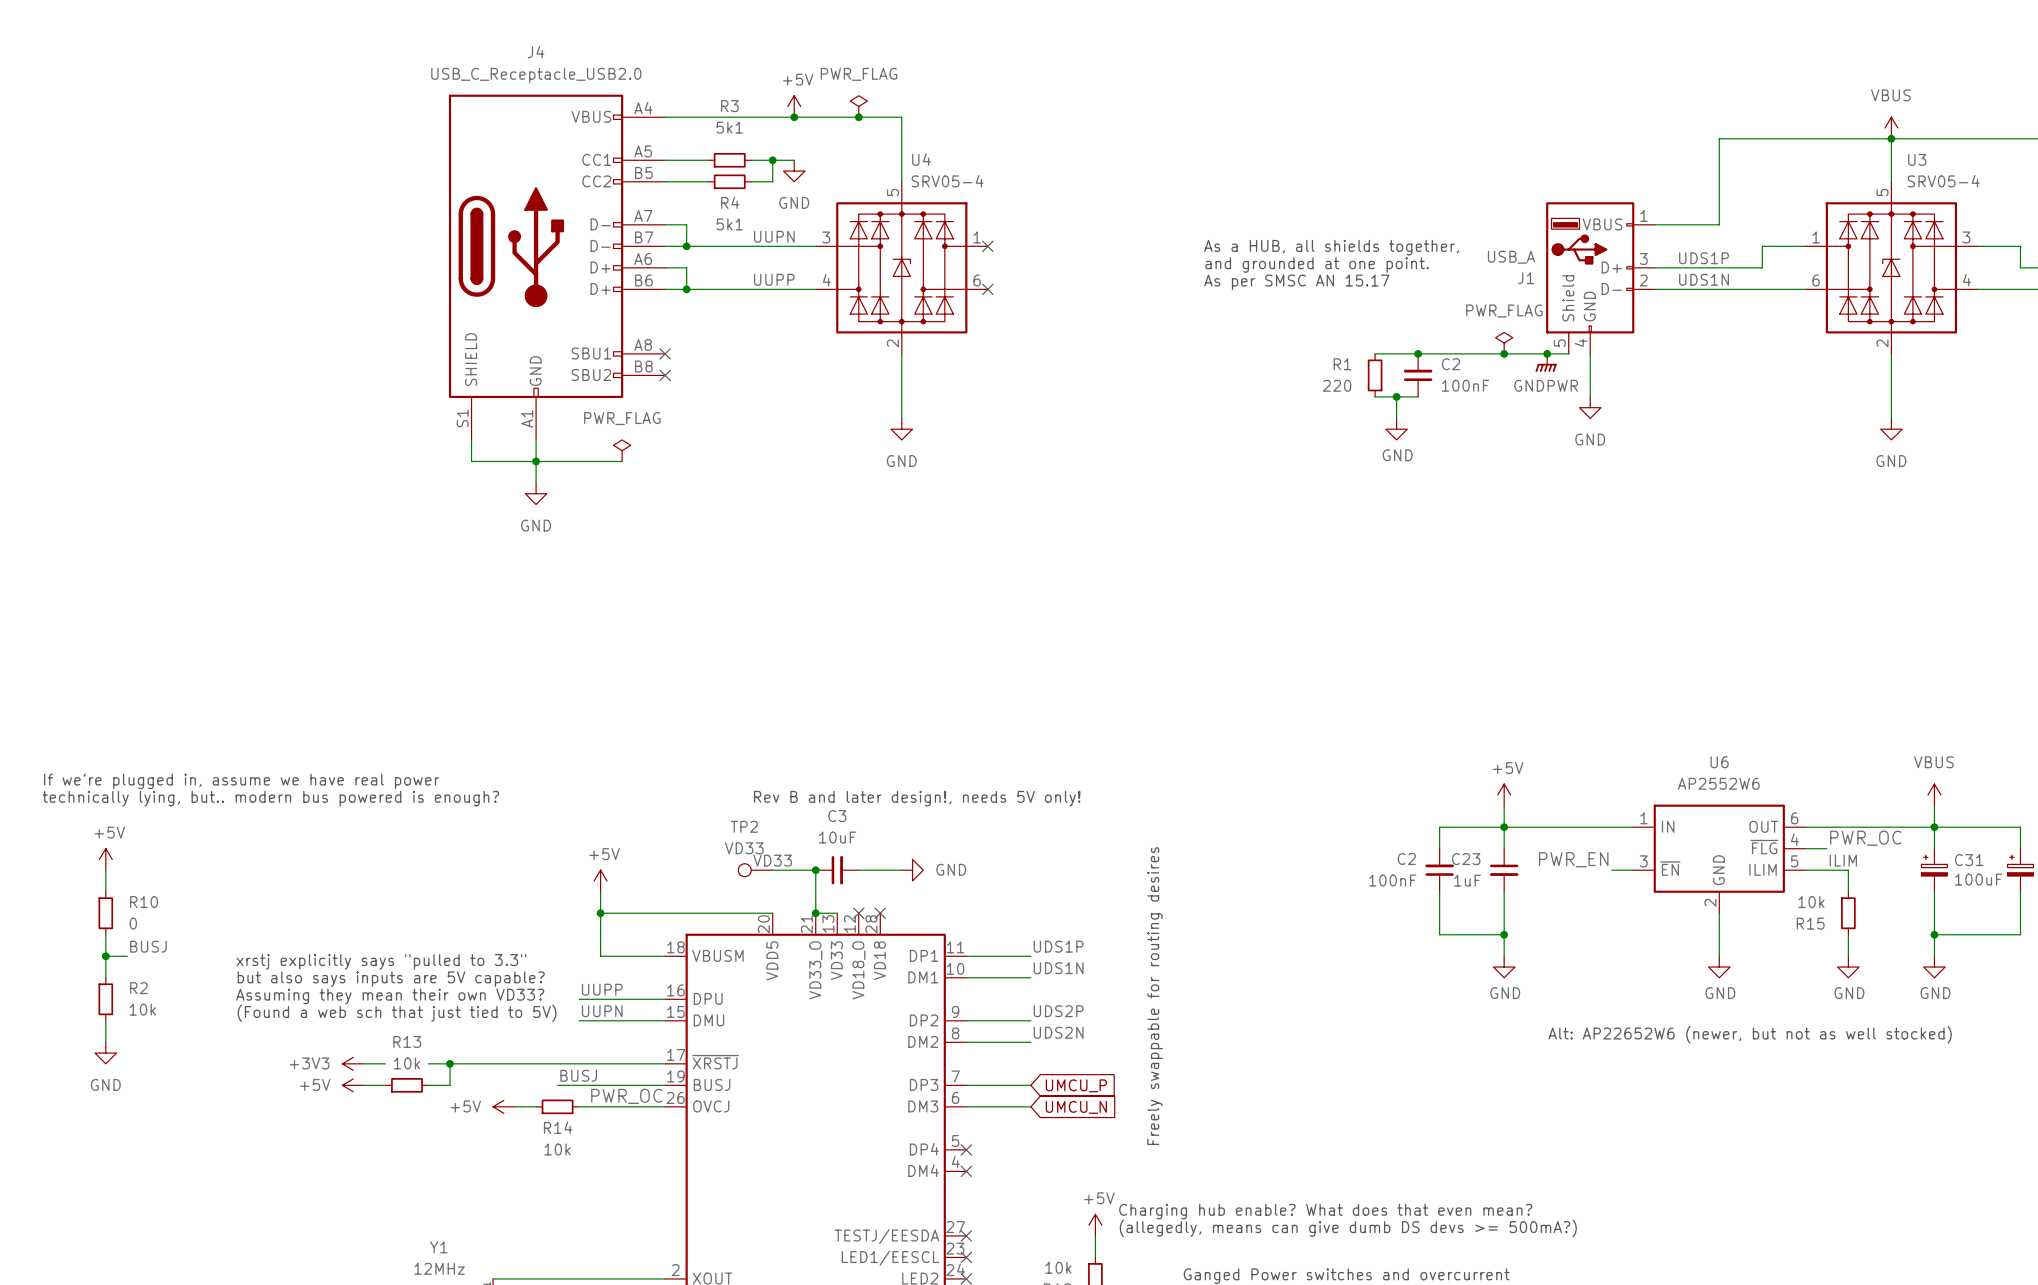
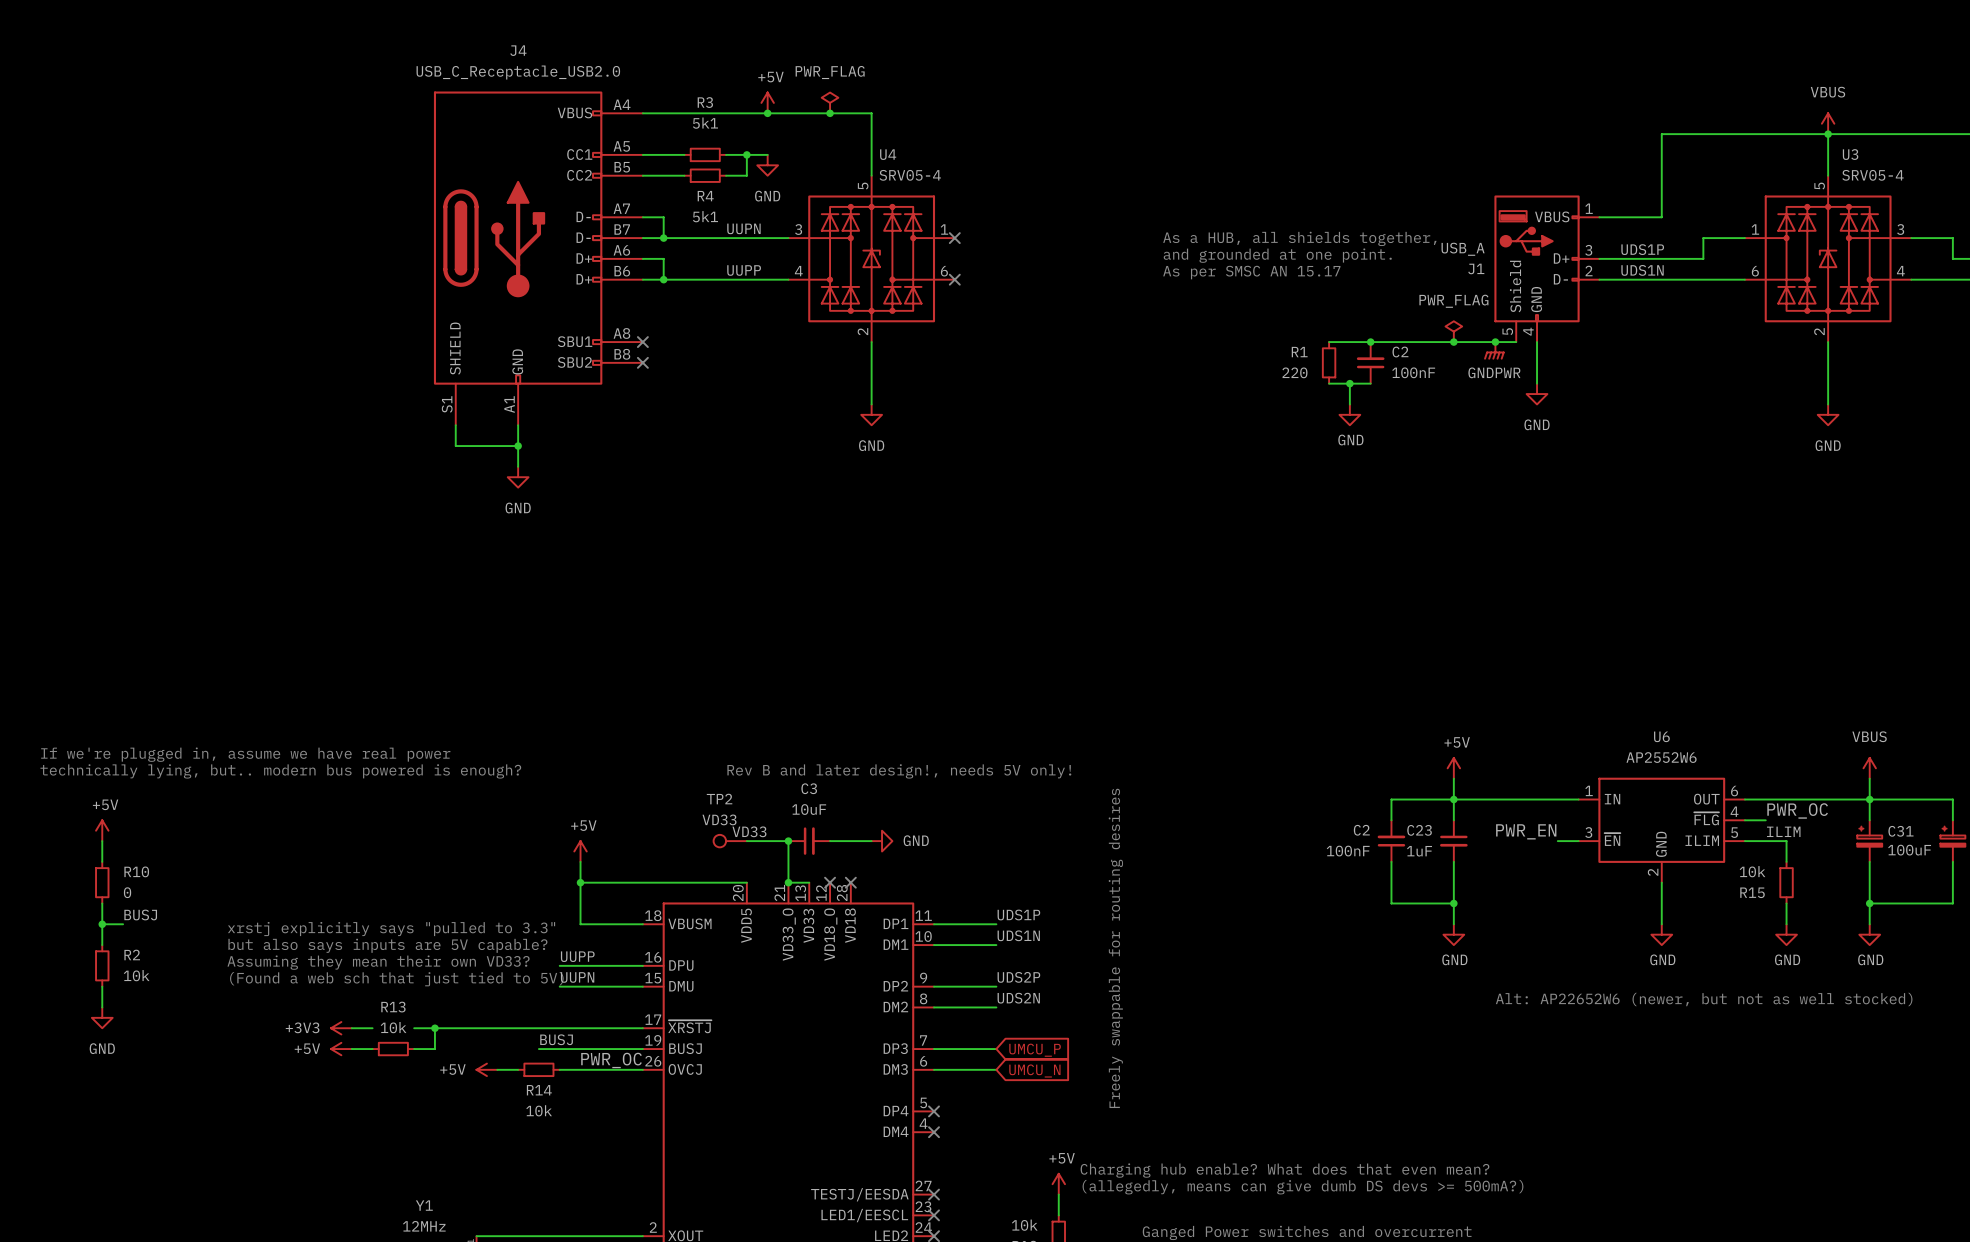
power symbol: PWR_FLAG (622, 450) -> none
wire: (536, 461) (622, 461) -> none

